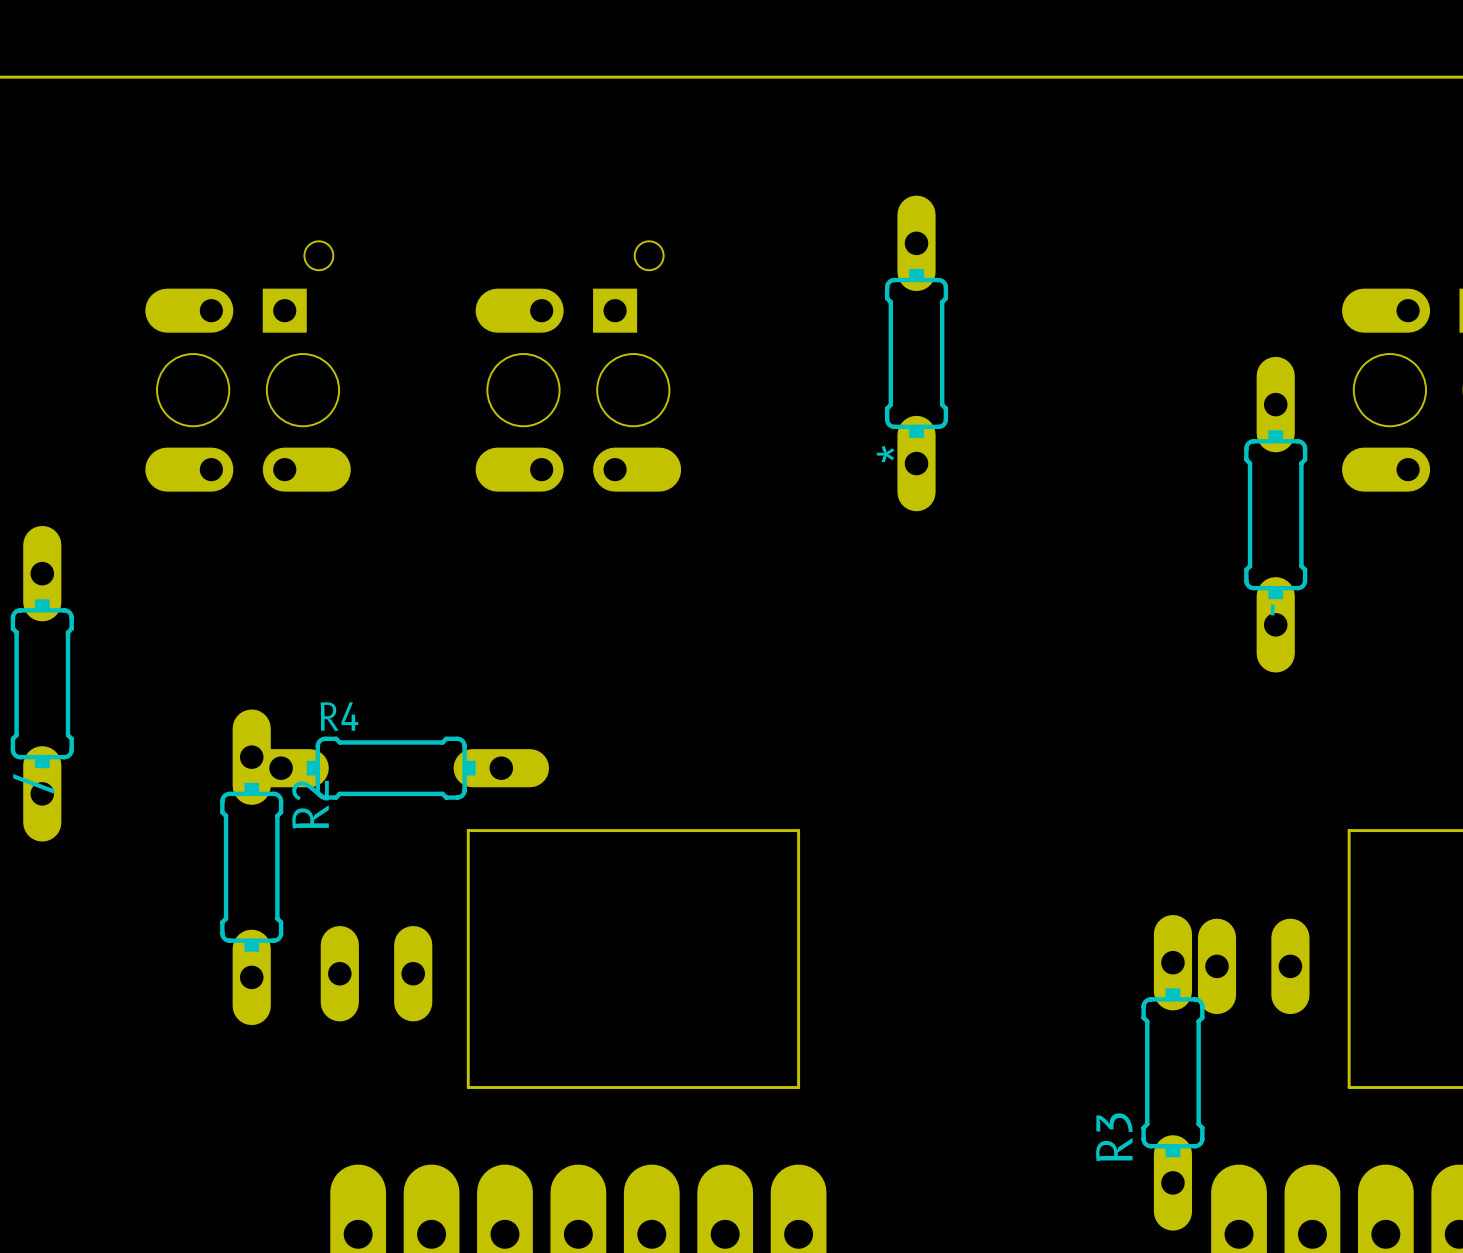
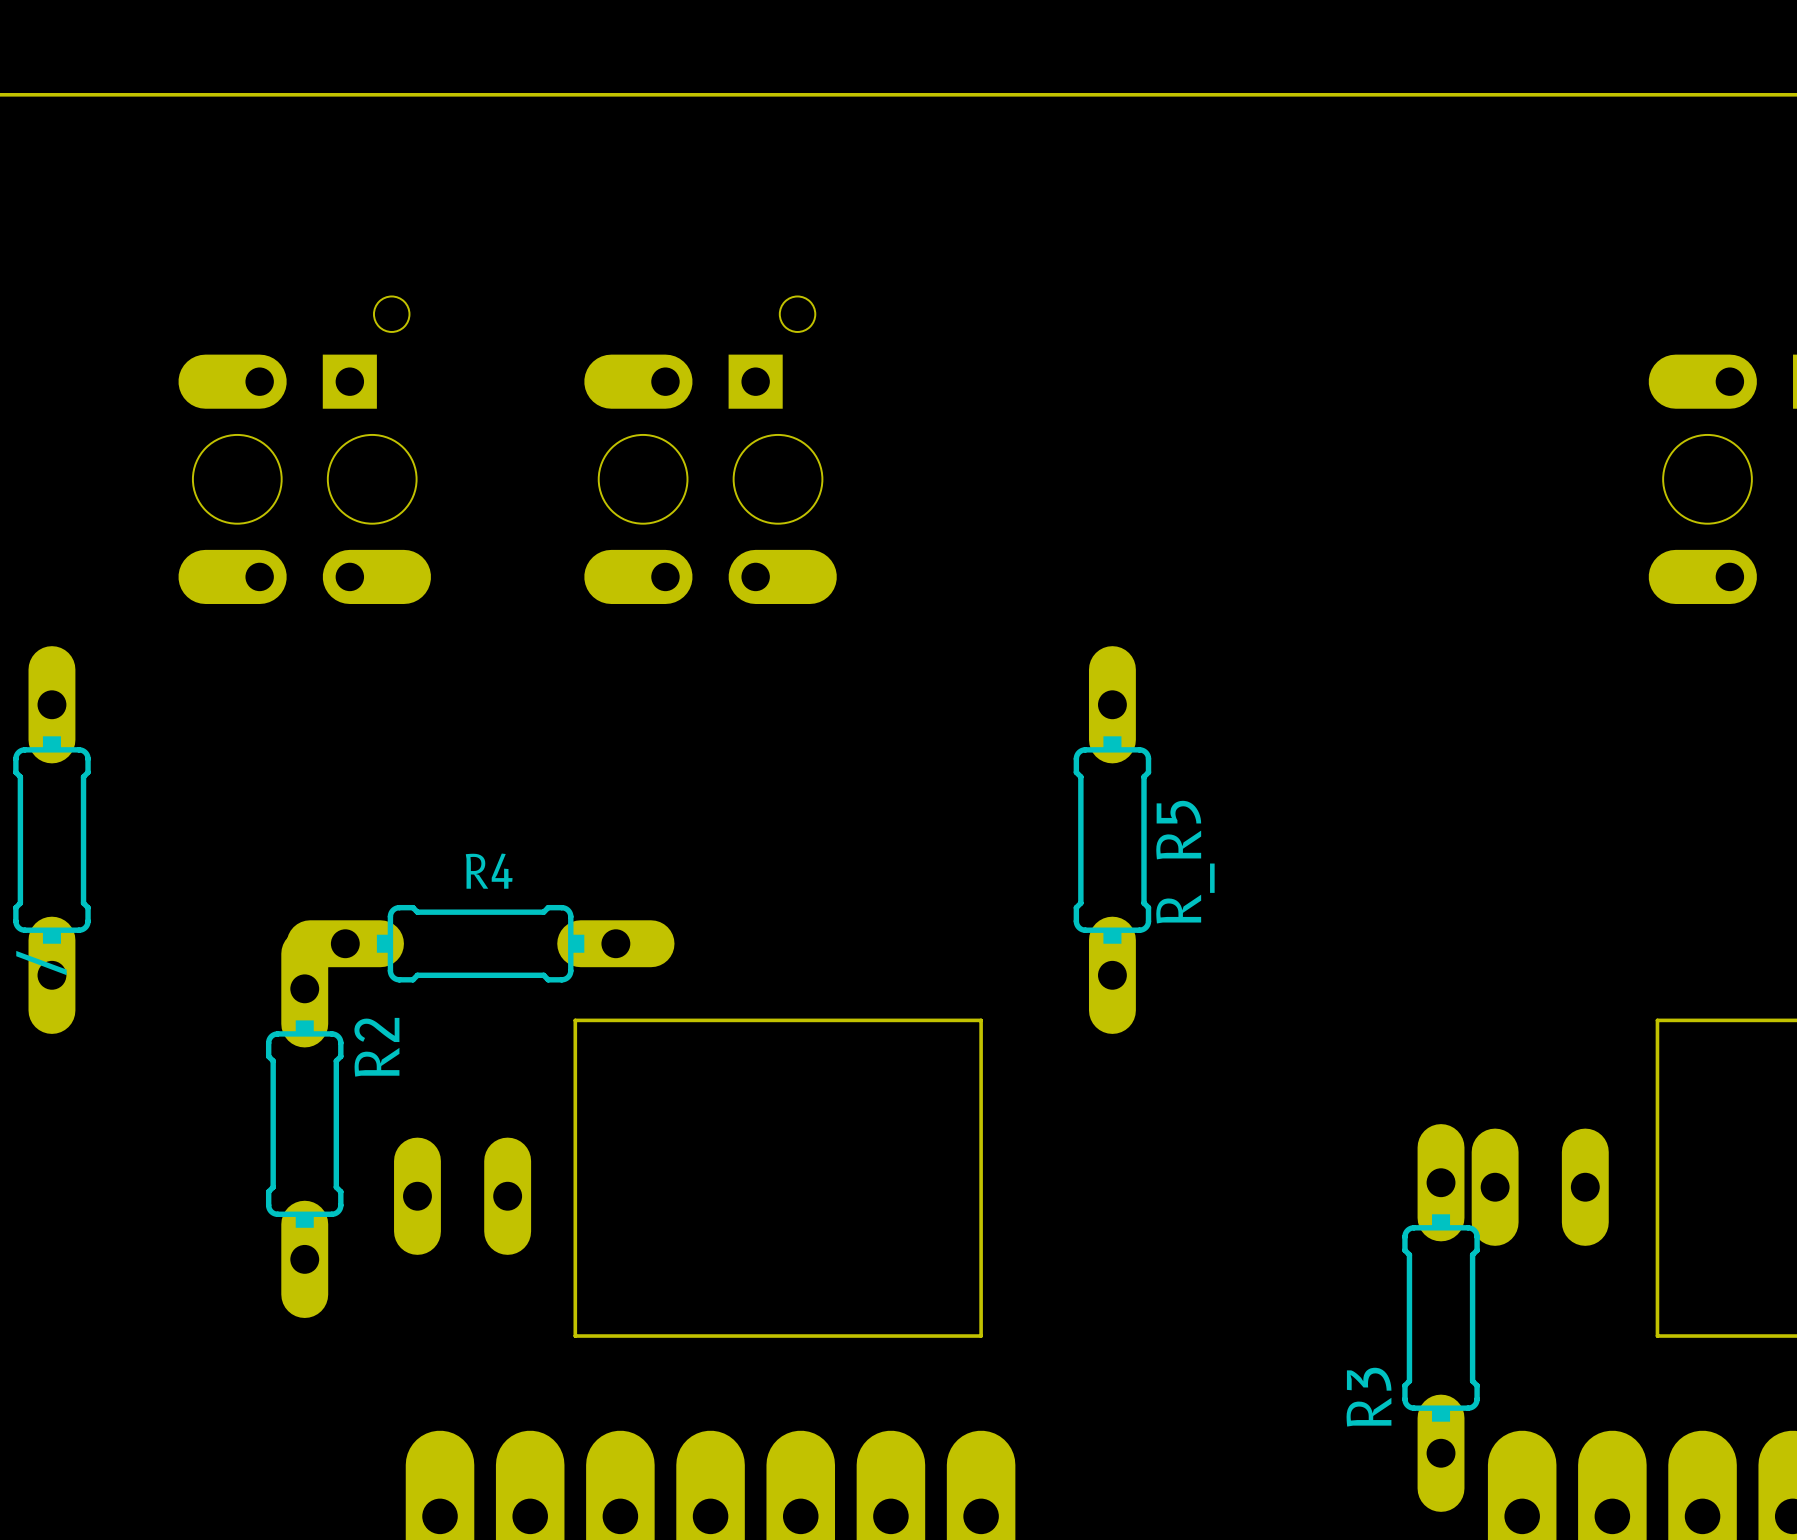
part: (916, 353) -> none
part: (1275, 514) -> none
R_R5: none -> (1112, 840)
R4 name position: R4 (339, 716) -> R4 (489, 871)
R2 position: (251, 867) -> (304, 1124)

